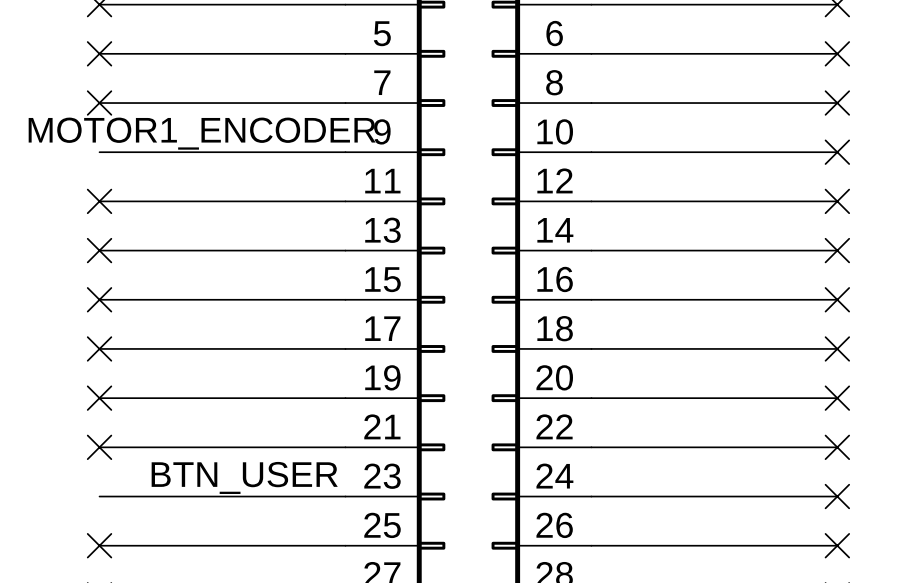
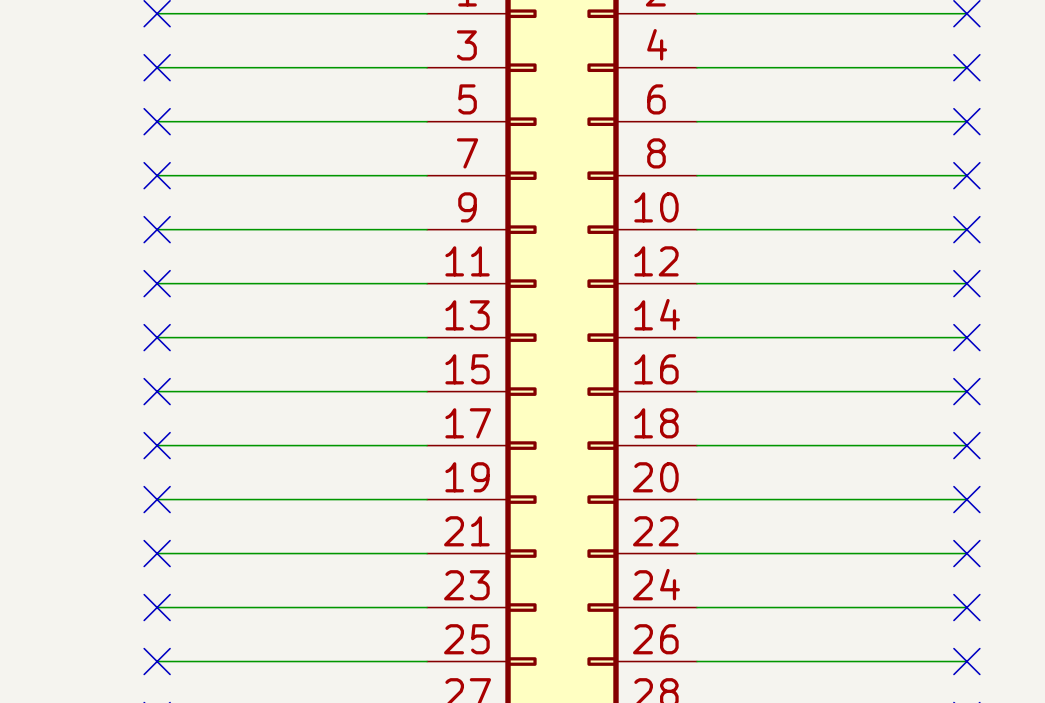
label: MOTOR1_ENCODER (202, 133) -> none
no-connect mark: none -> (157, 229)
label: BTN_USER (244, 477) -> none
no-connect mark: none -> (157, 607)

